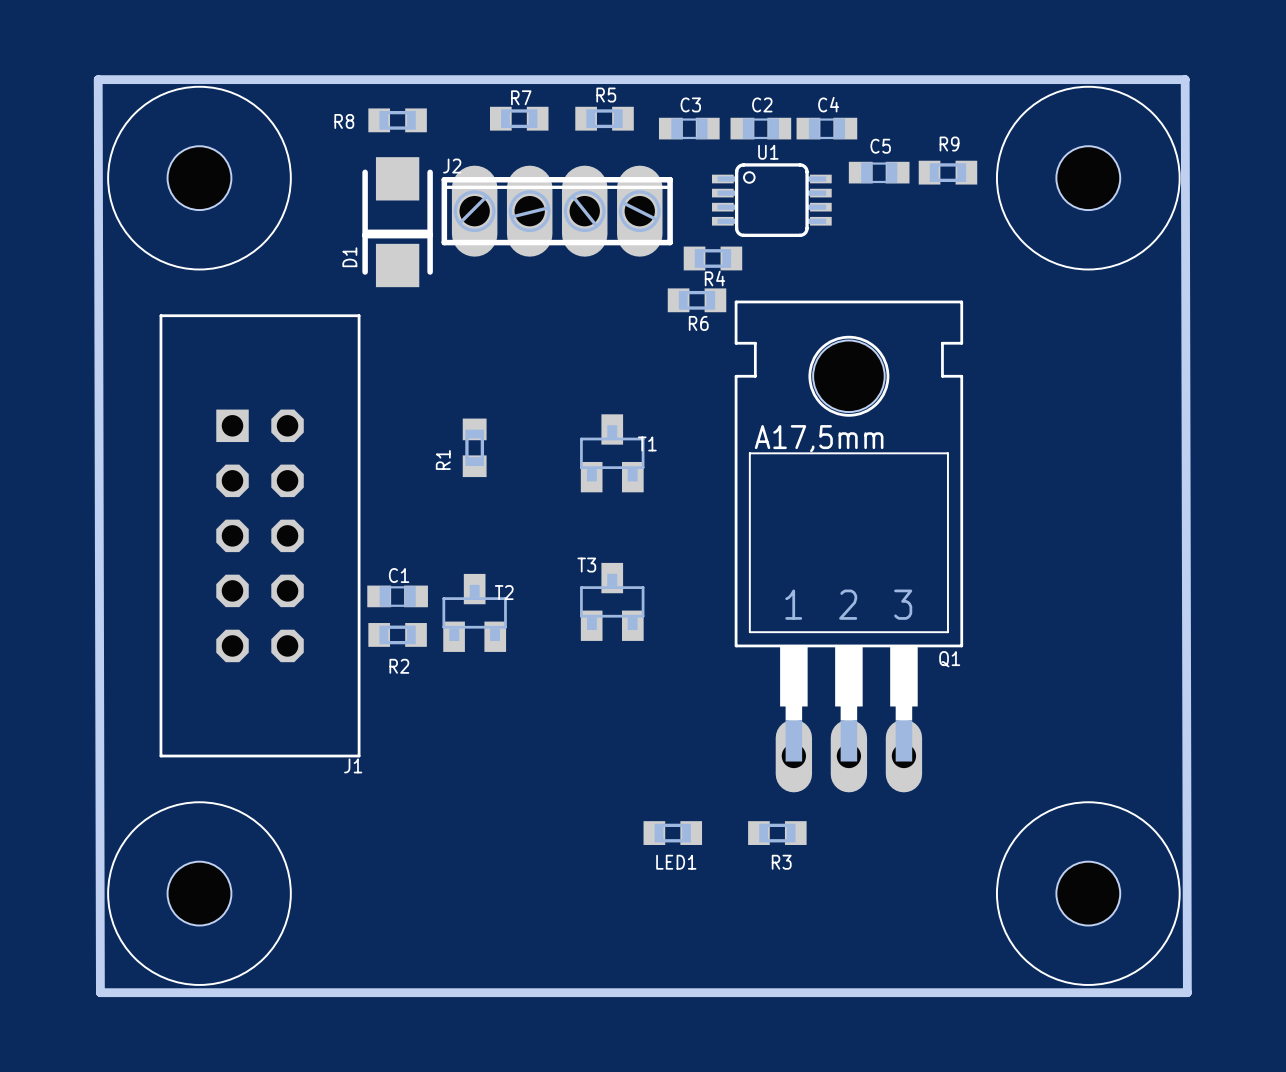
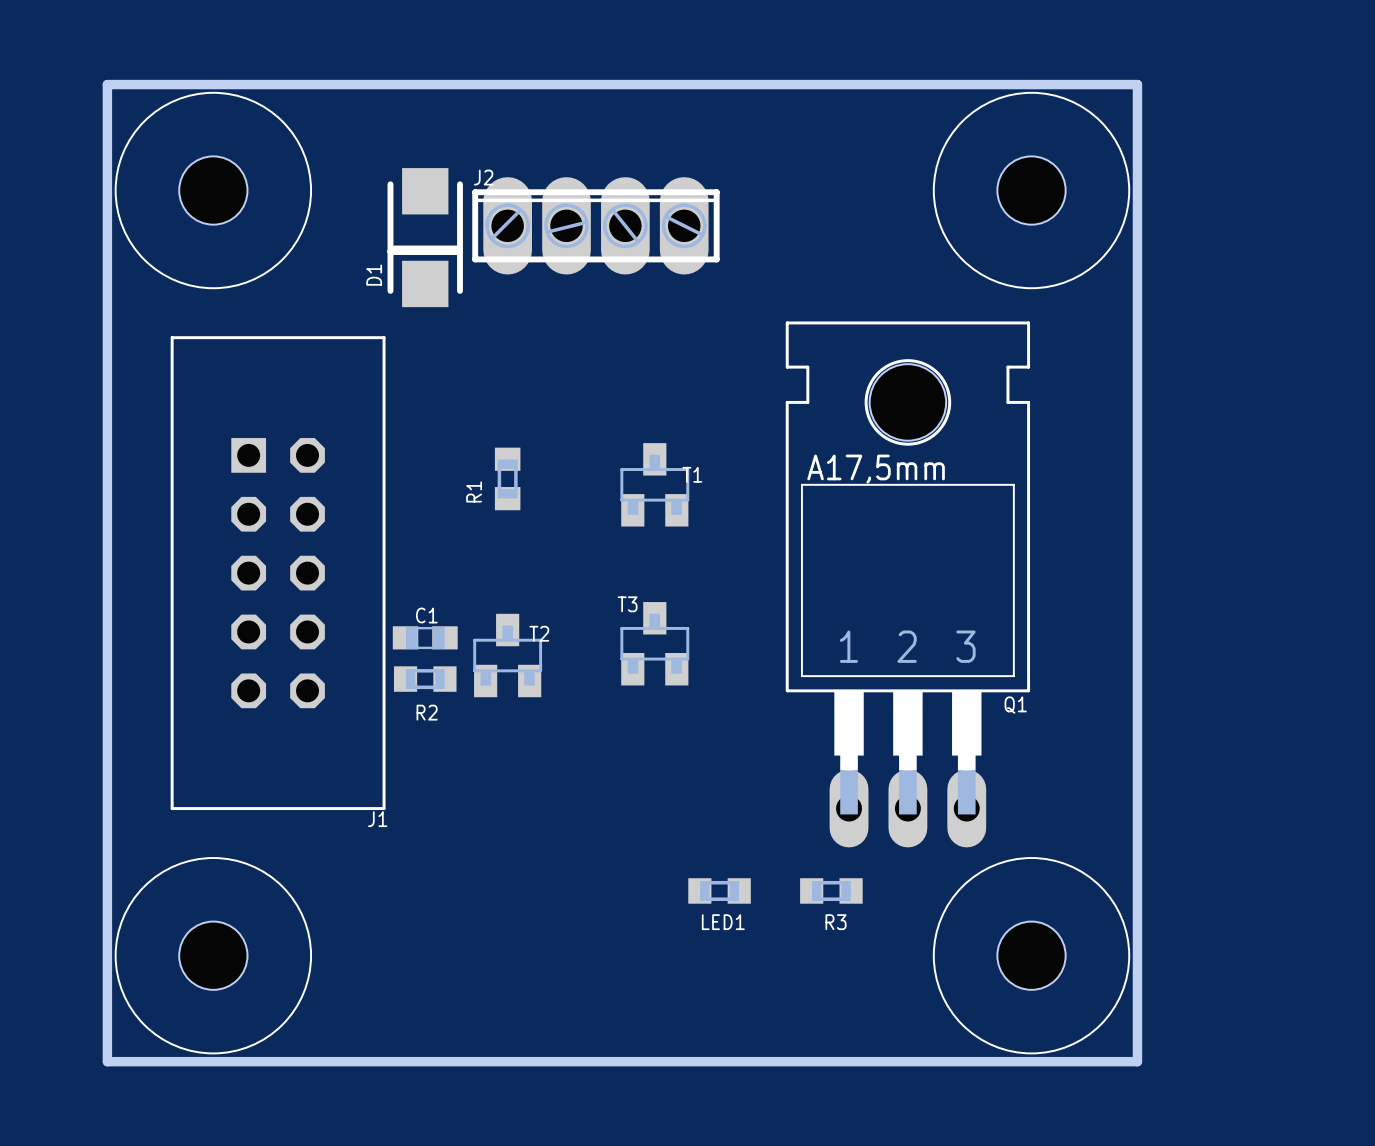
R7: (519, 118) -> none
R5: (604, 118) -> none
R8: (397, 120) -> none
C3: (689, 128) -> none
C2: (760, 128) -> none
C4: (826, 128) -> none
C5: (879, 172) -> none
R9: (947, 172) -> none
drawing position: (1088, 178) -> (1031, 190)
hole position: (1088, 178) -> (1031, 190)
U1: (771, 200) -> none
R4: (712, 258) -> none
R6: (697, 300) -> none
drawing position: (1088, 893) -> (1031, 955)
hole position: (1088, 893) -> (1031, 955)
board edge: (100, 992) (98, 79) (1185, 79) (1187, 992) (1063, 992) -> (107, 1061) (107, 84) (1137, 84) (1137, 1061)

